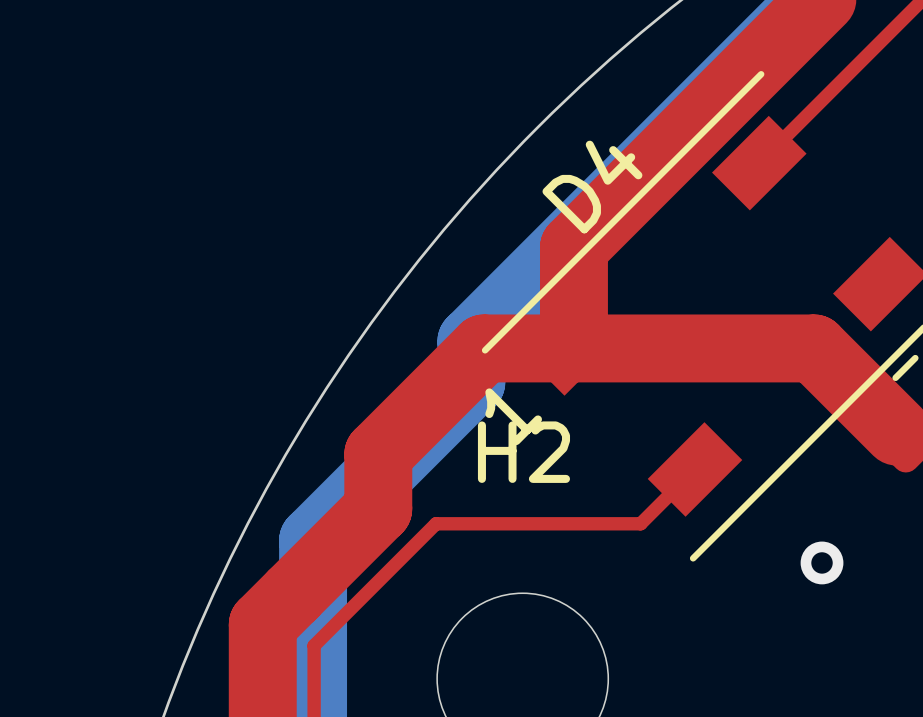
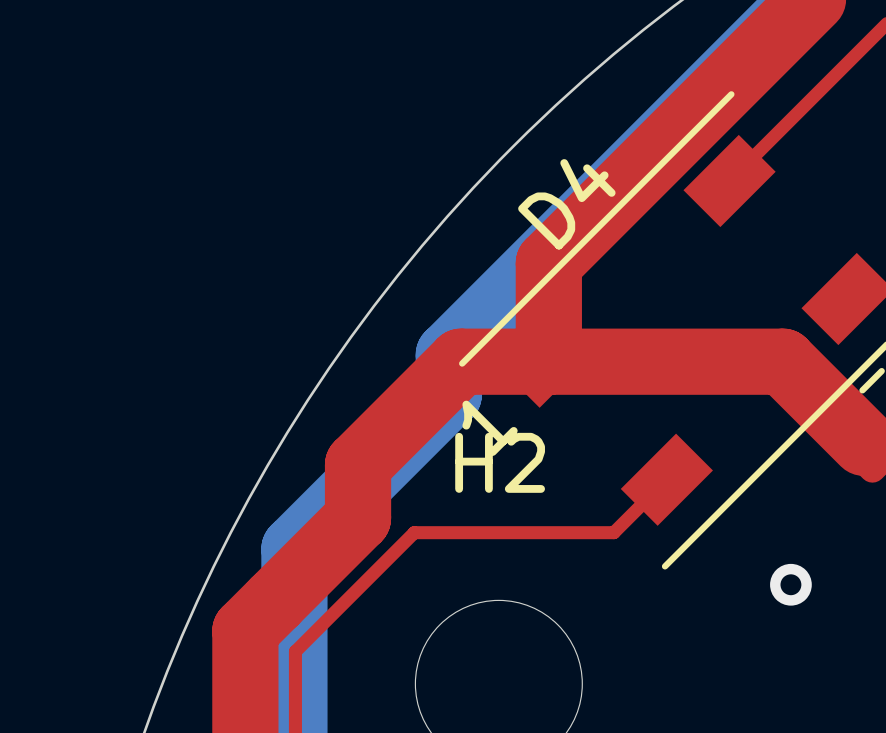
via position: (822, 562) -> (790, 584)

